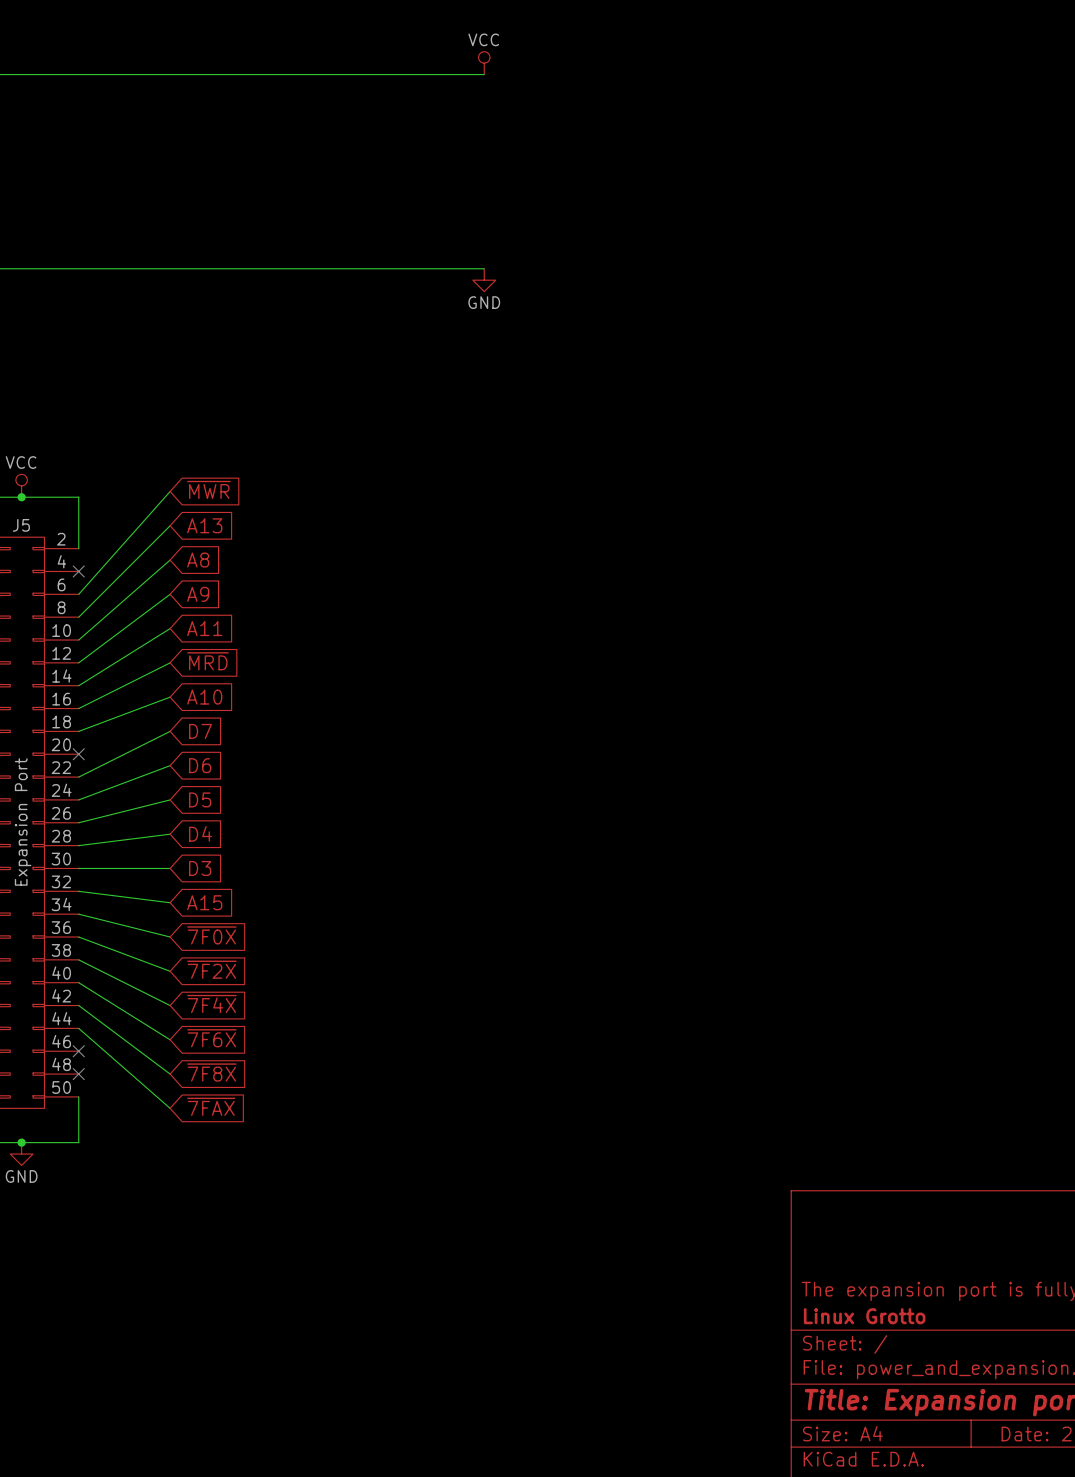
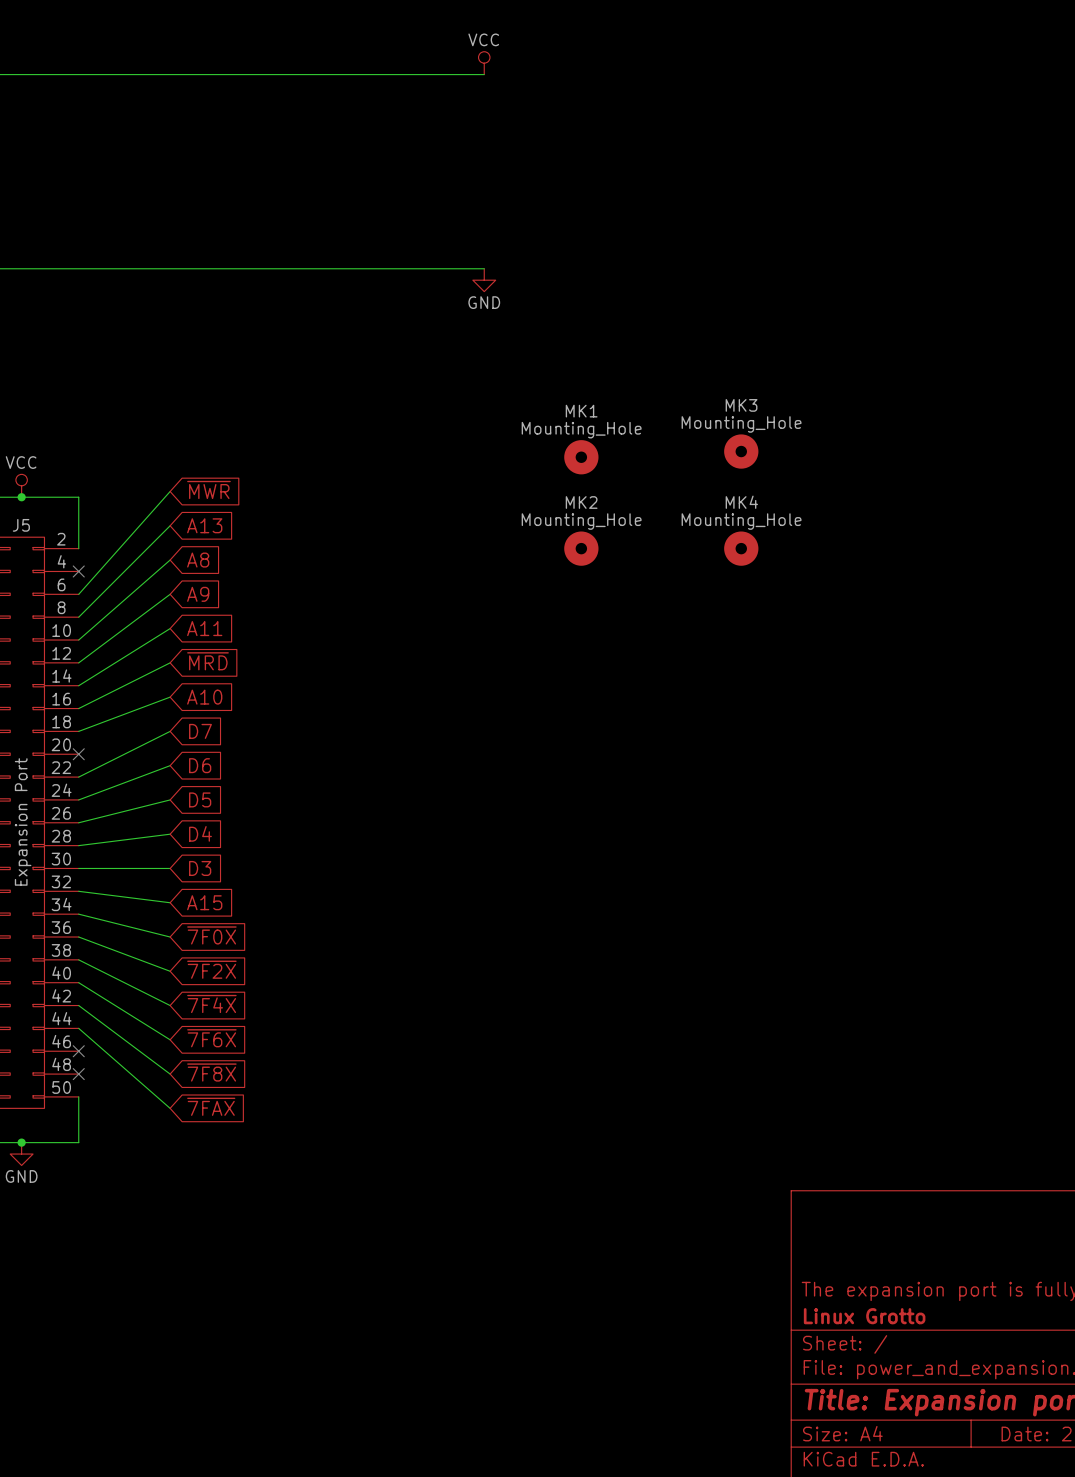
MK3: none -> Mounting_Hole (741, 451)
MK1: none -> Mounting_Hole (581, 457)
MK2: none -> Mounting_Hole (581, 548)
MK4: none -> Mounting_Hole (741, 548)

